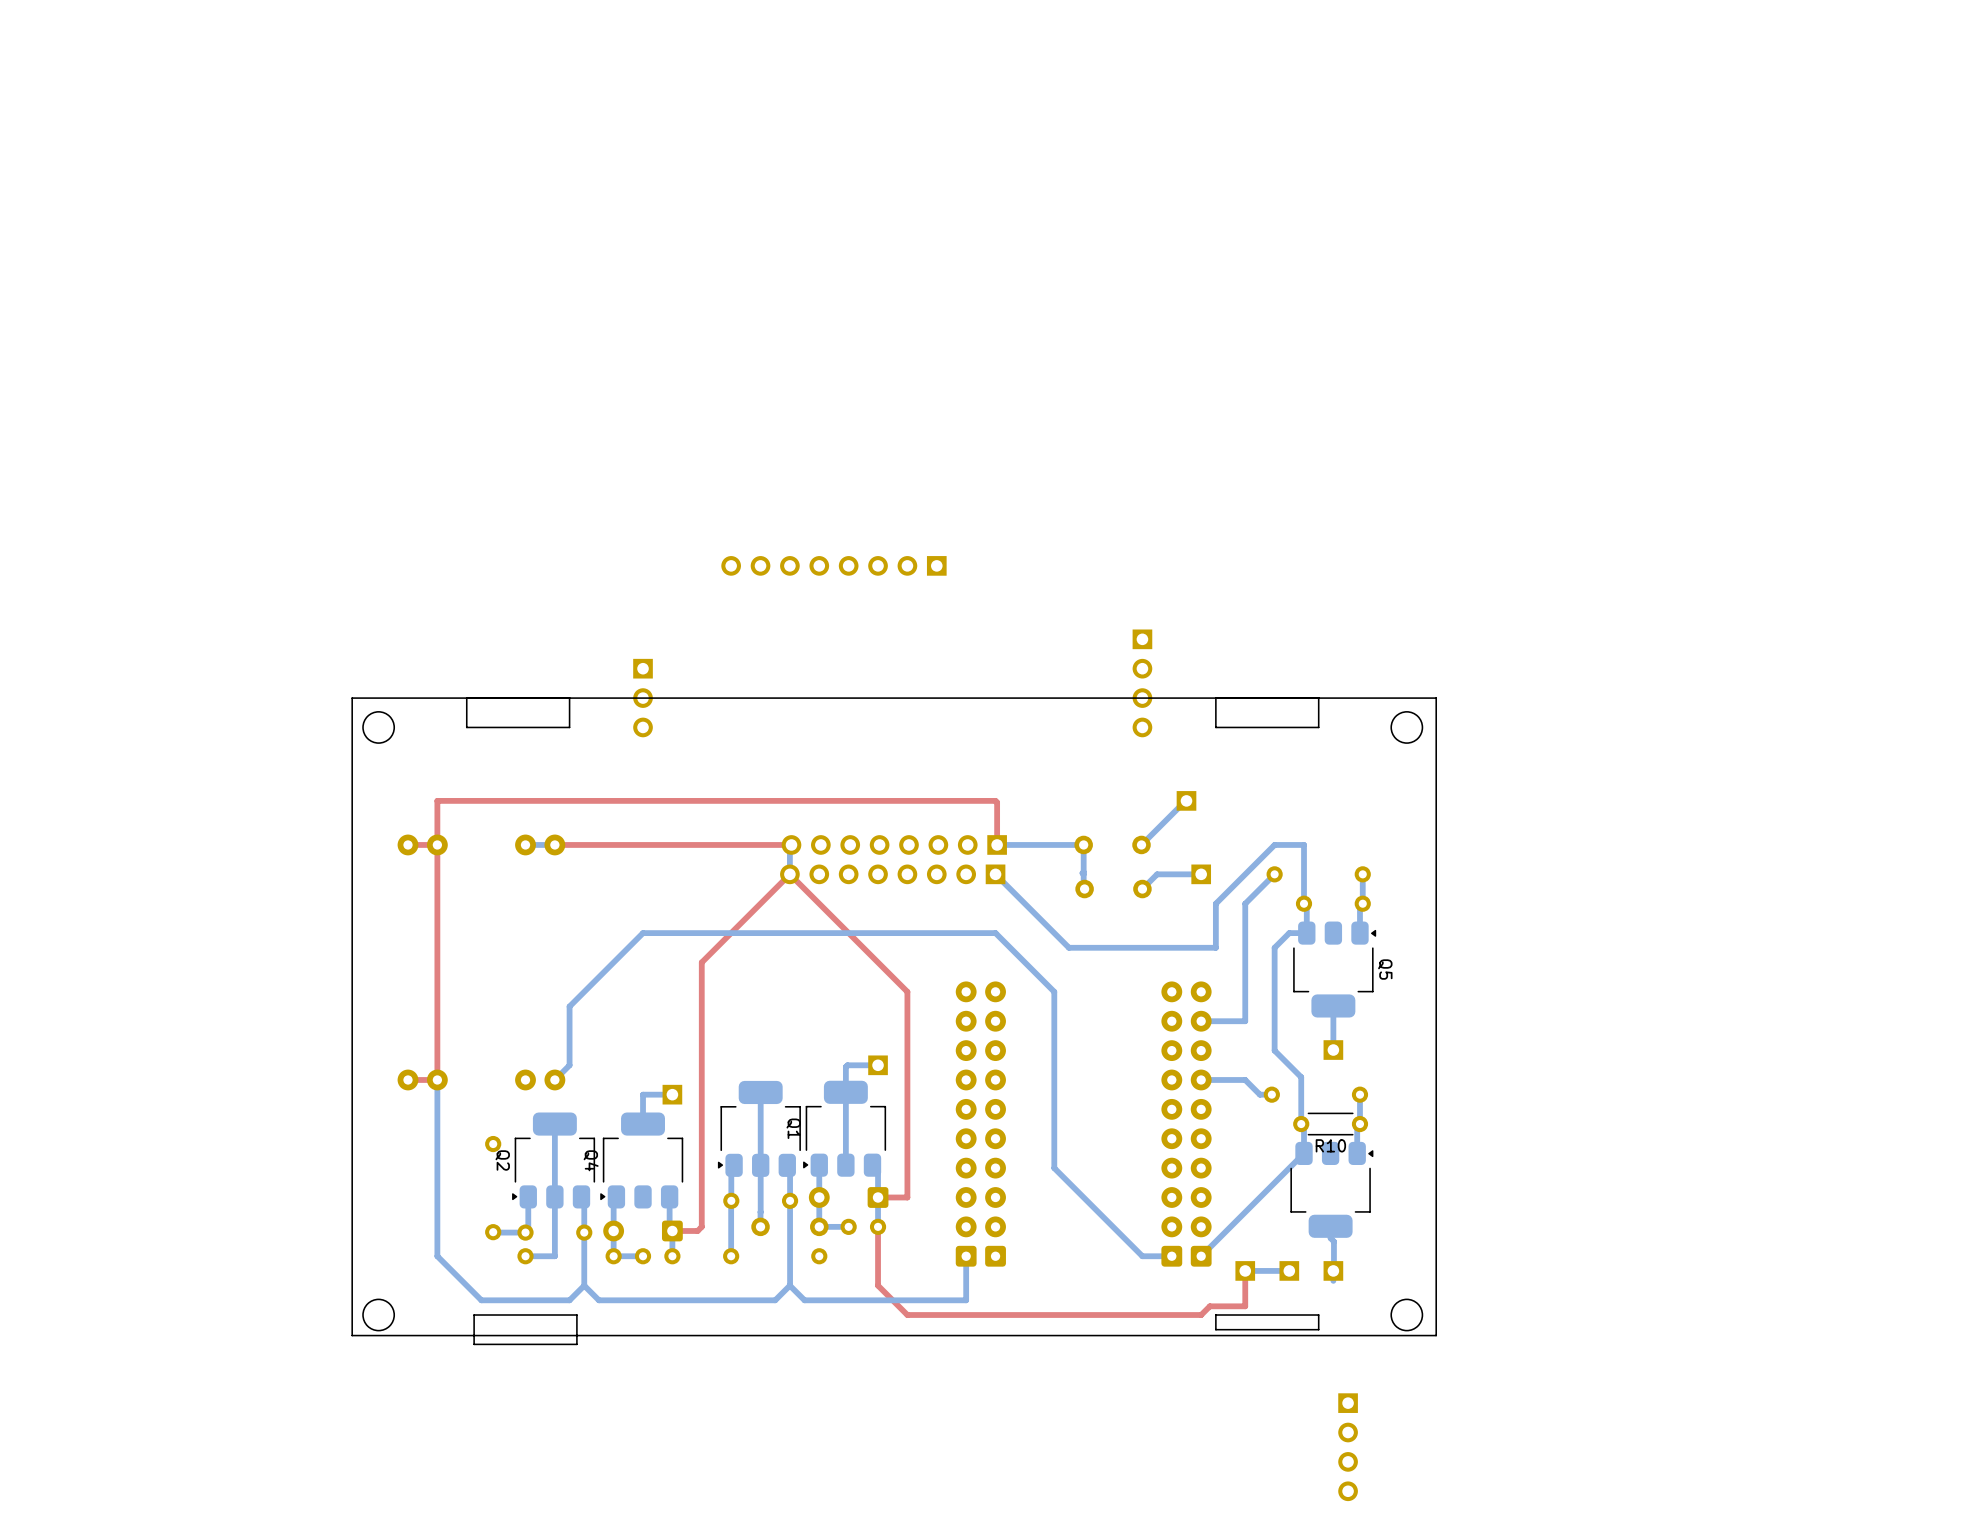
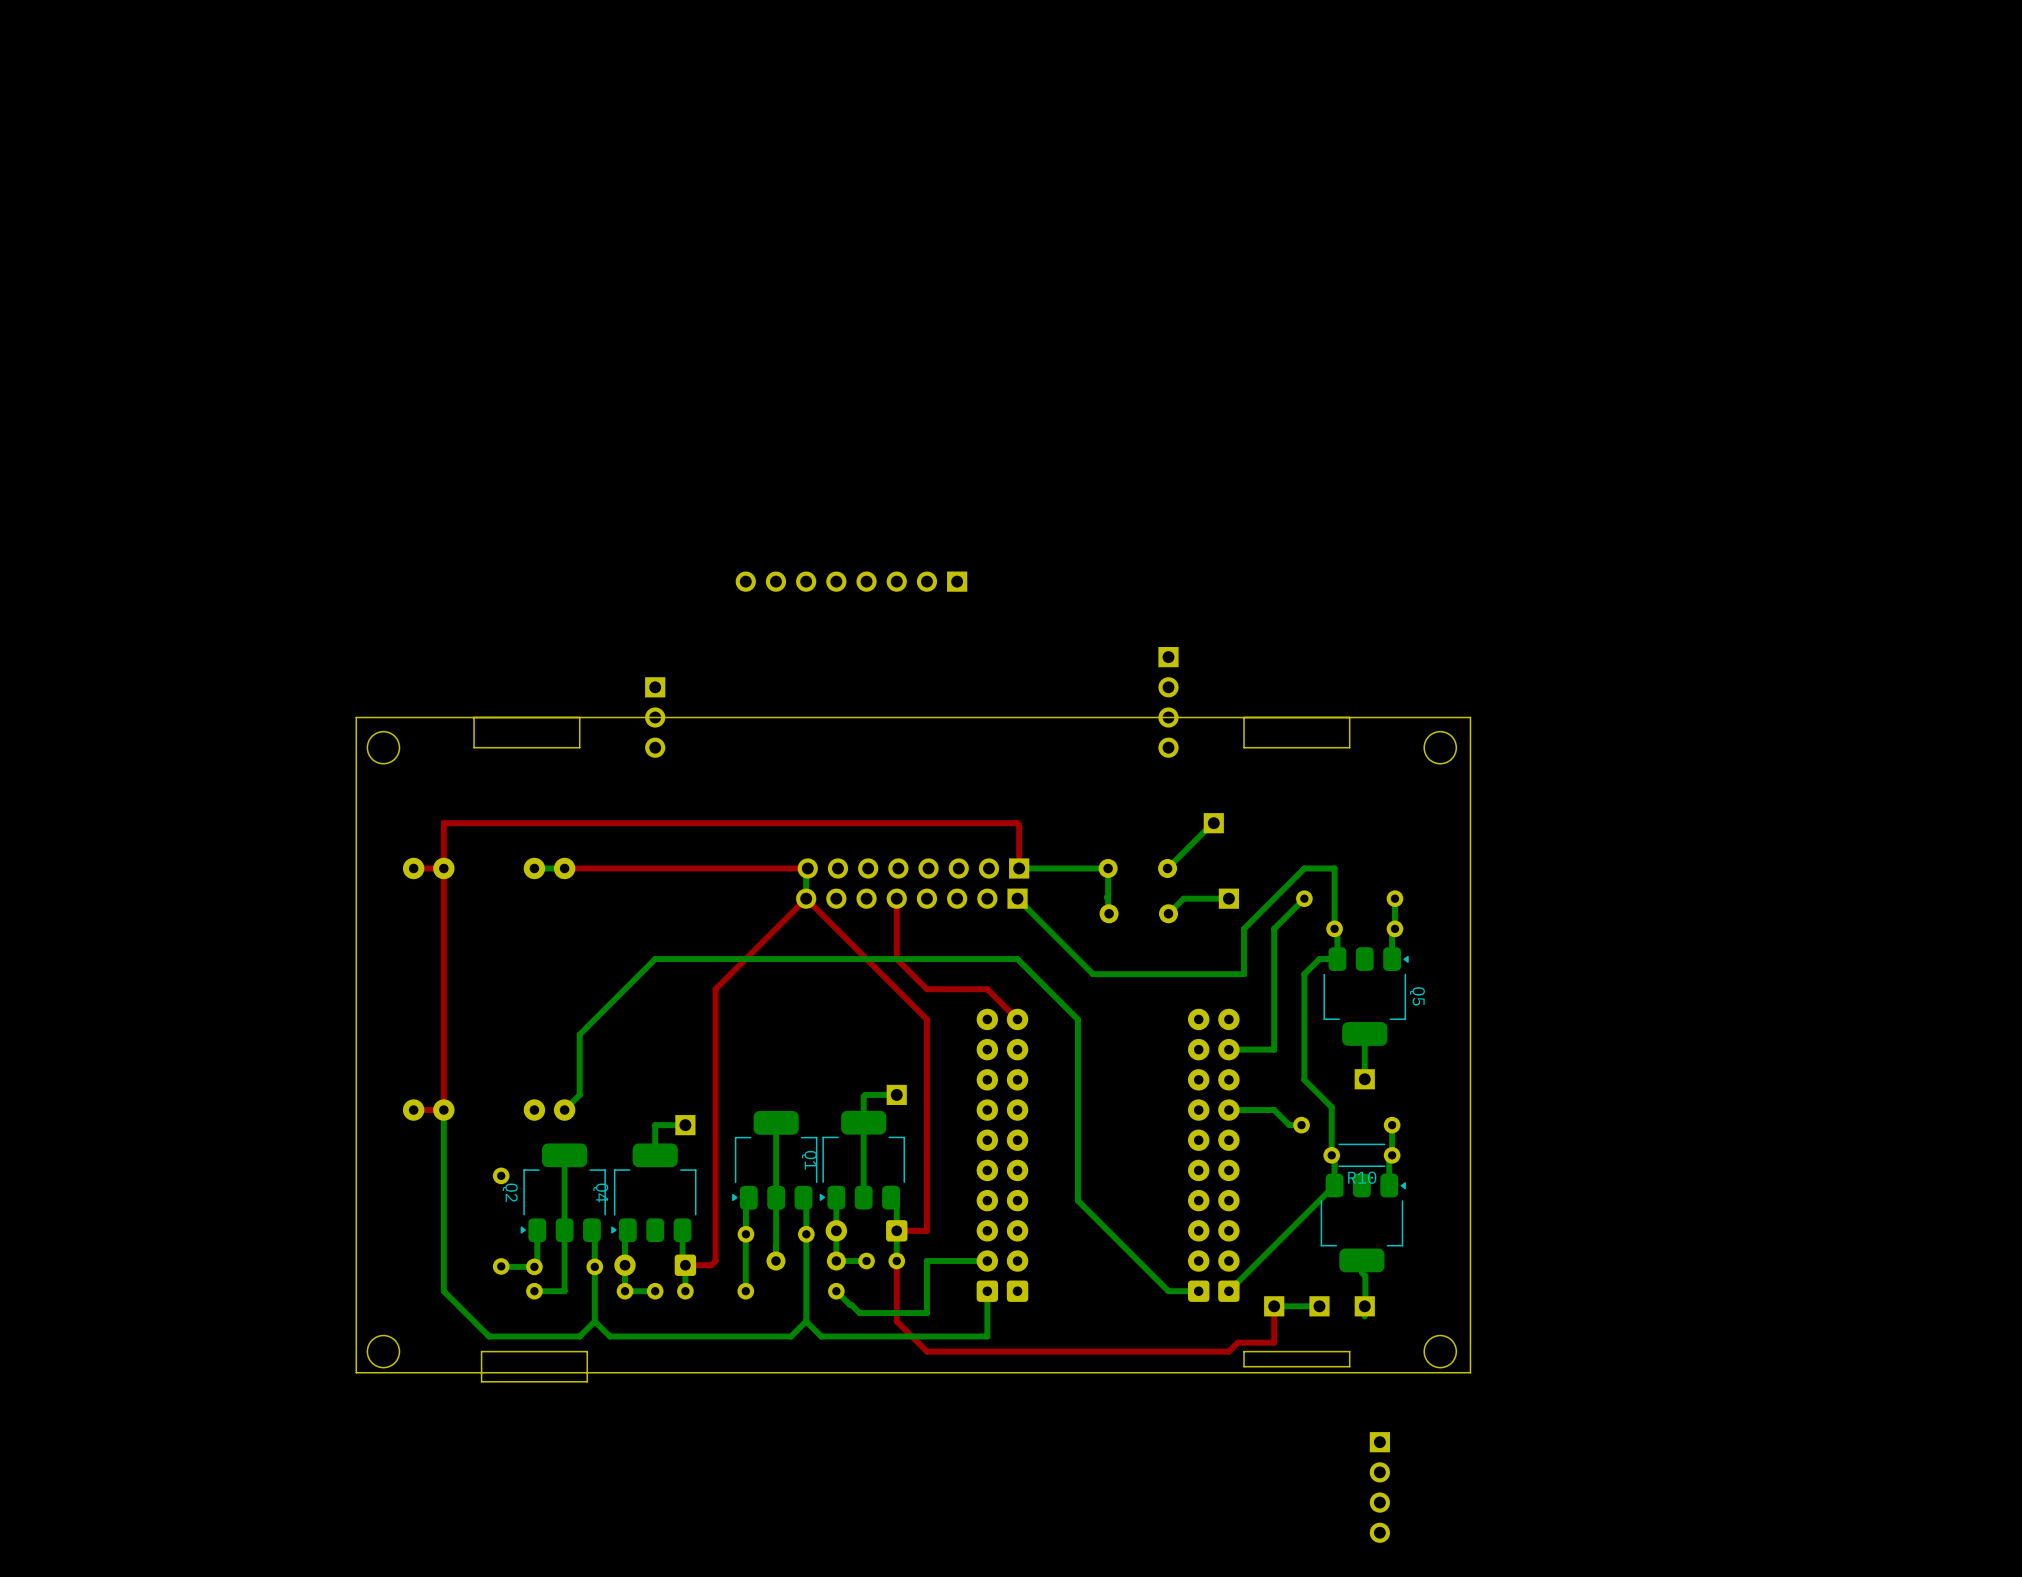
top track: none -> (896, 898) (896, 959) (926, 989) (987, 989) (1017, 1019)
bottom track: none -> (987, 1261) (926, 1261) (926, 1313) (859, 1313) (836, 1291)

